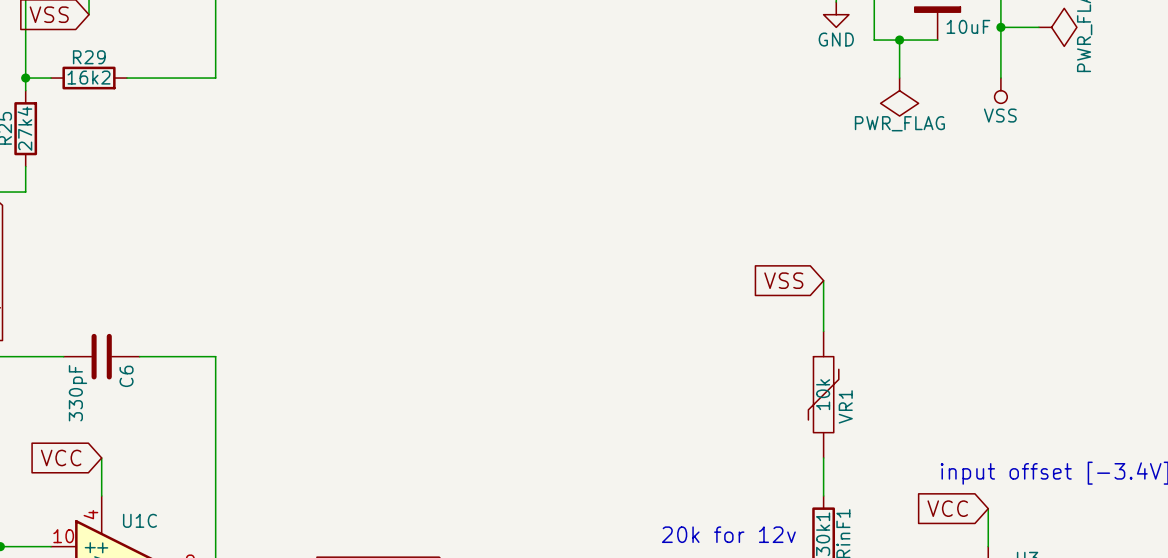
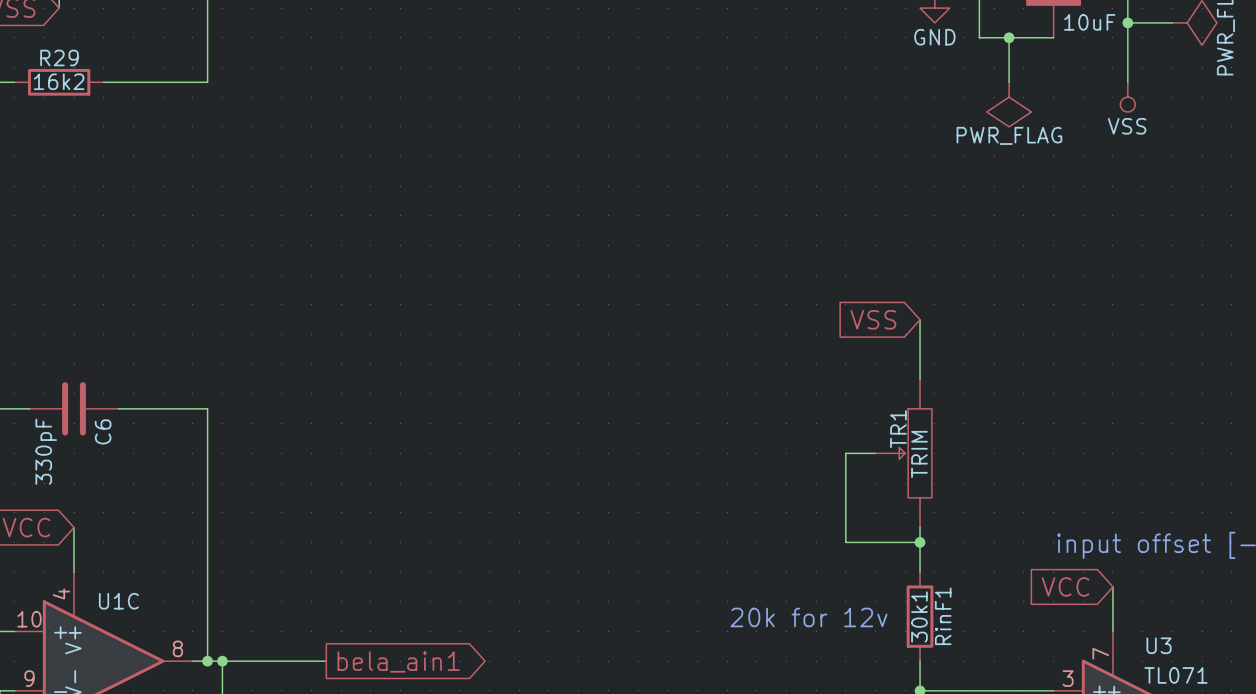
wire: none -> (875, 453) (845, 453) (845, 542) (920, 542)
TR1: none -> TRIM (903, 453)
VR1: 10k (823, 394) -> none
junction: none -> (920, 542)

